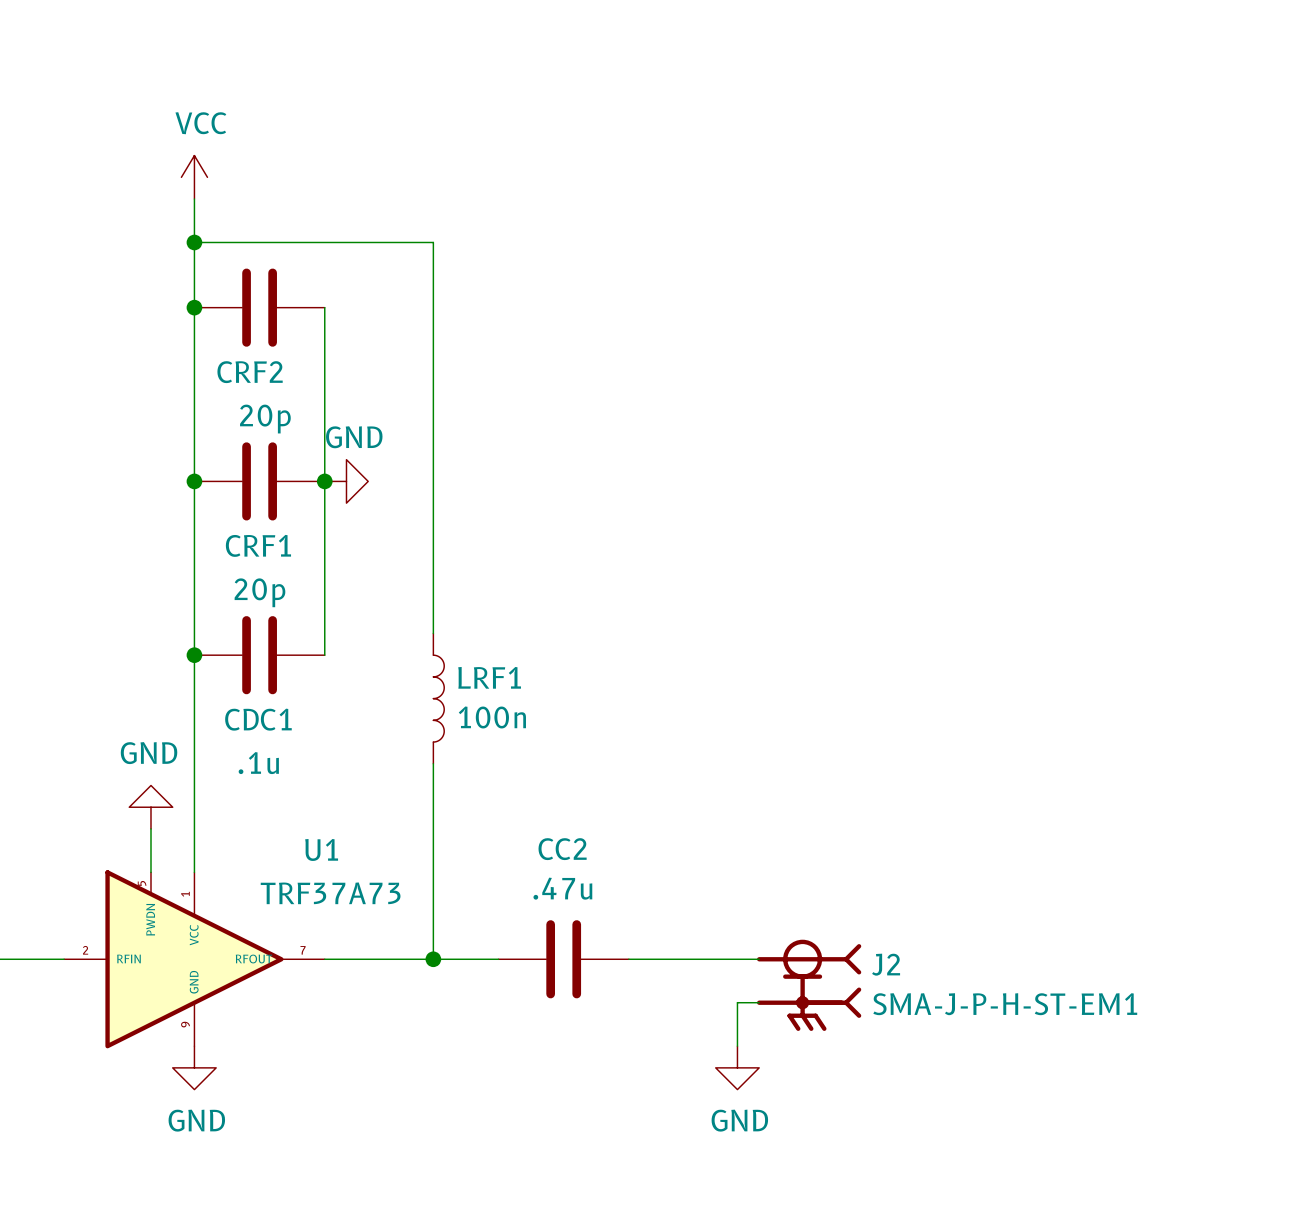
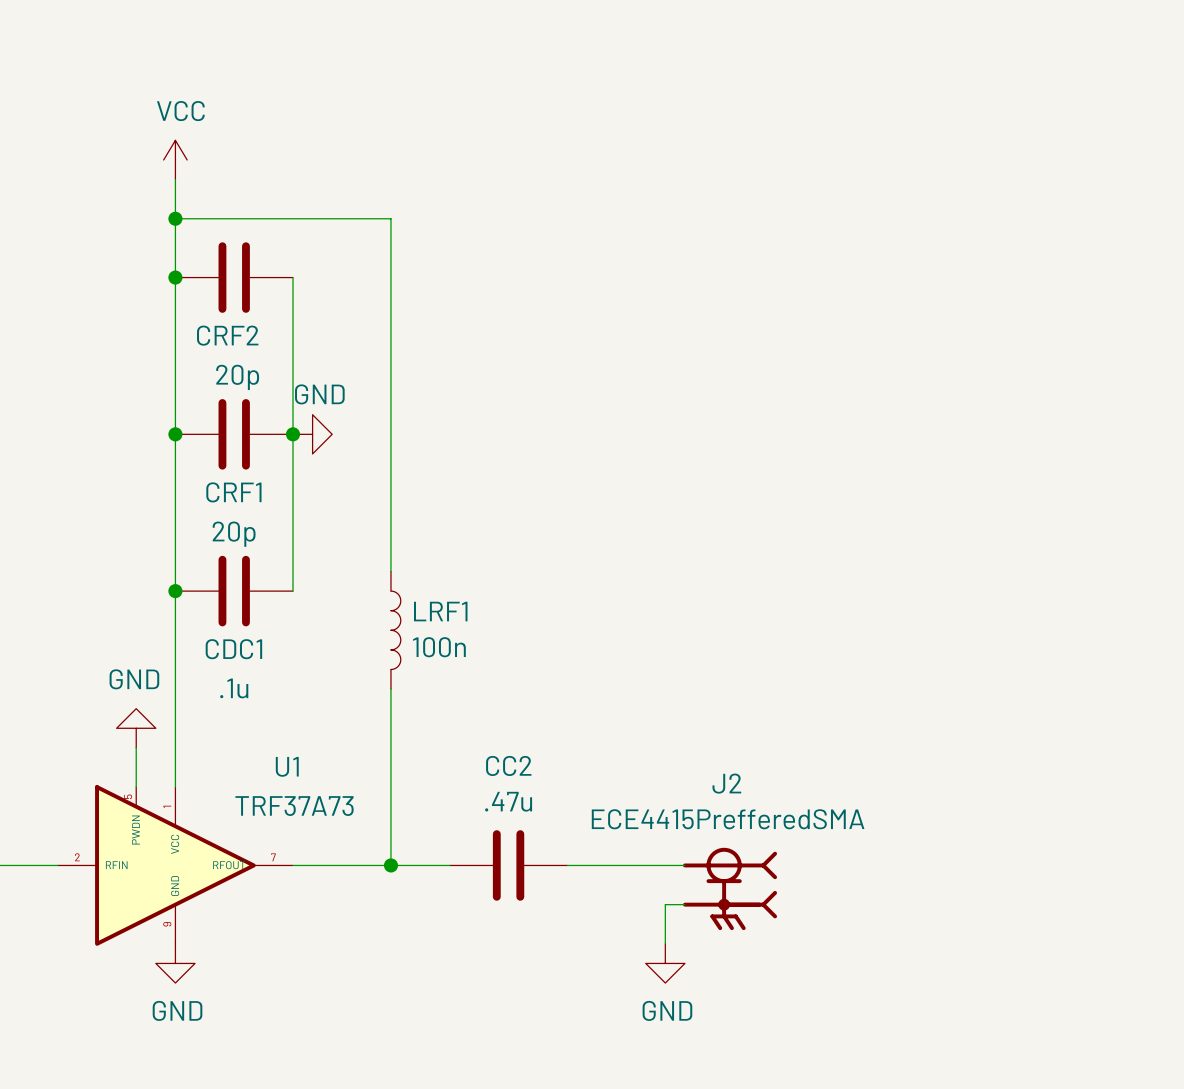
J2 name position: J2 (886, 964) -> J2 (726, 783)
J2 value: SMA-J-P-H-ST-EM1 (1005, 1004) -> ECE4415PrefferedSMA (728, 819)

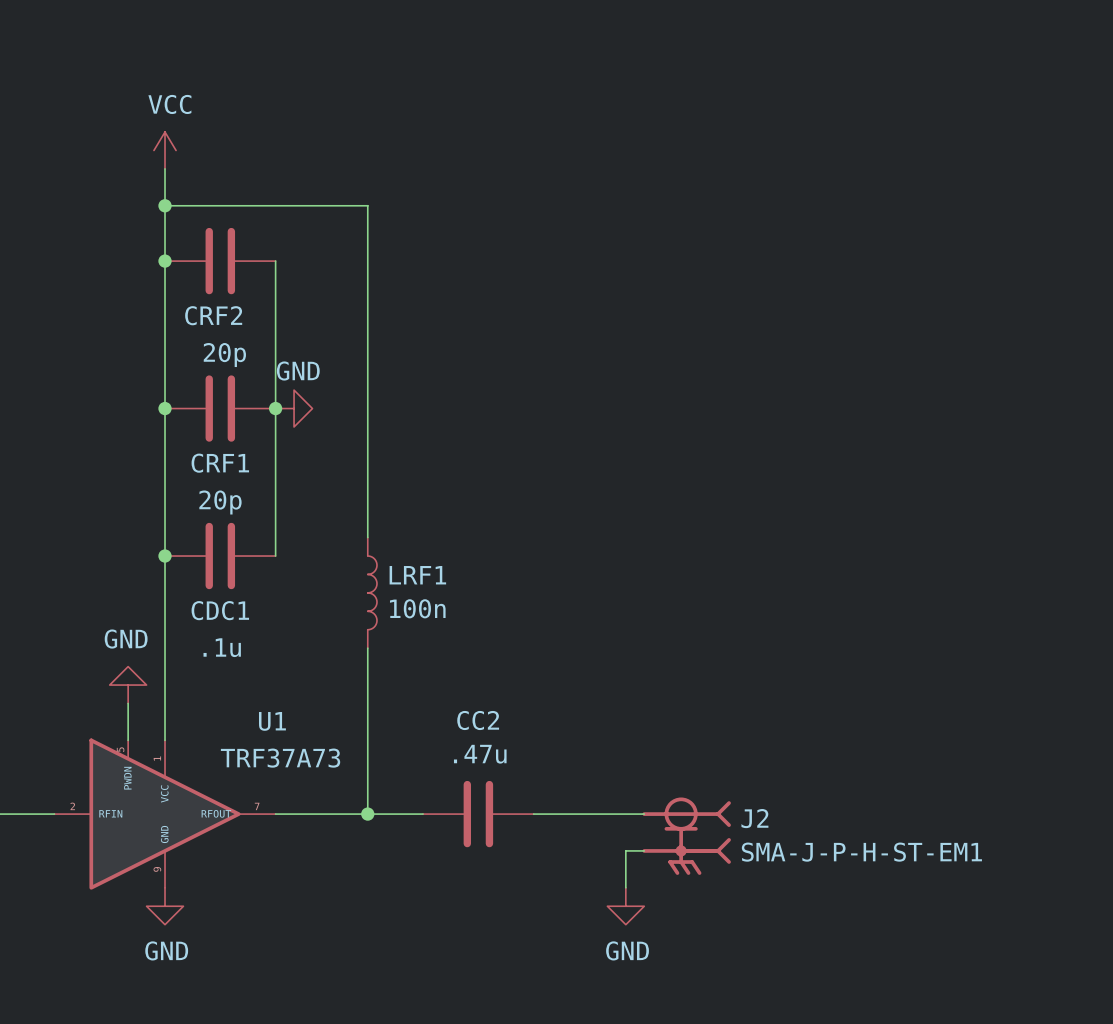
J2 name position: J2 (726, 783) -> J2 (754, 818)
J2 value: ECE4415PrefferedSMA (728, 819) -> SMA-J-P-H-ST-EM1 (861, 852)

